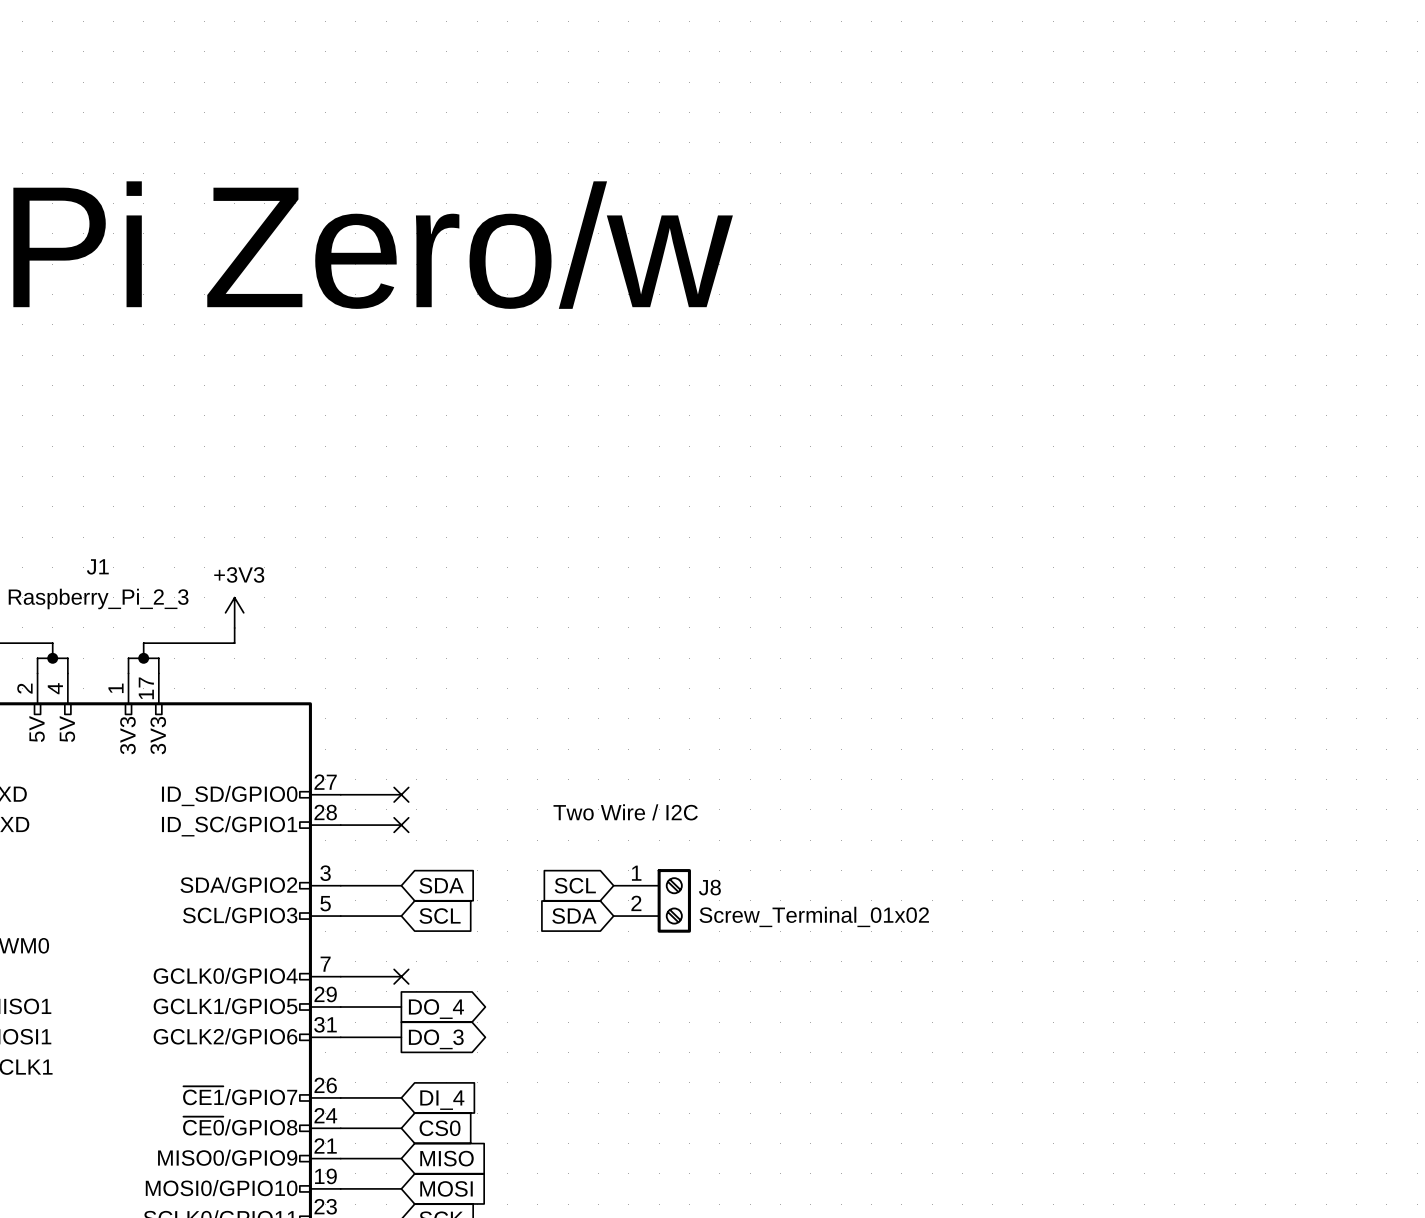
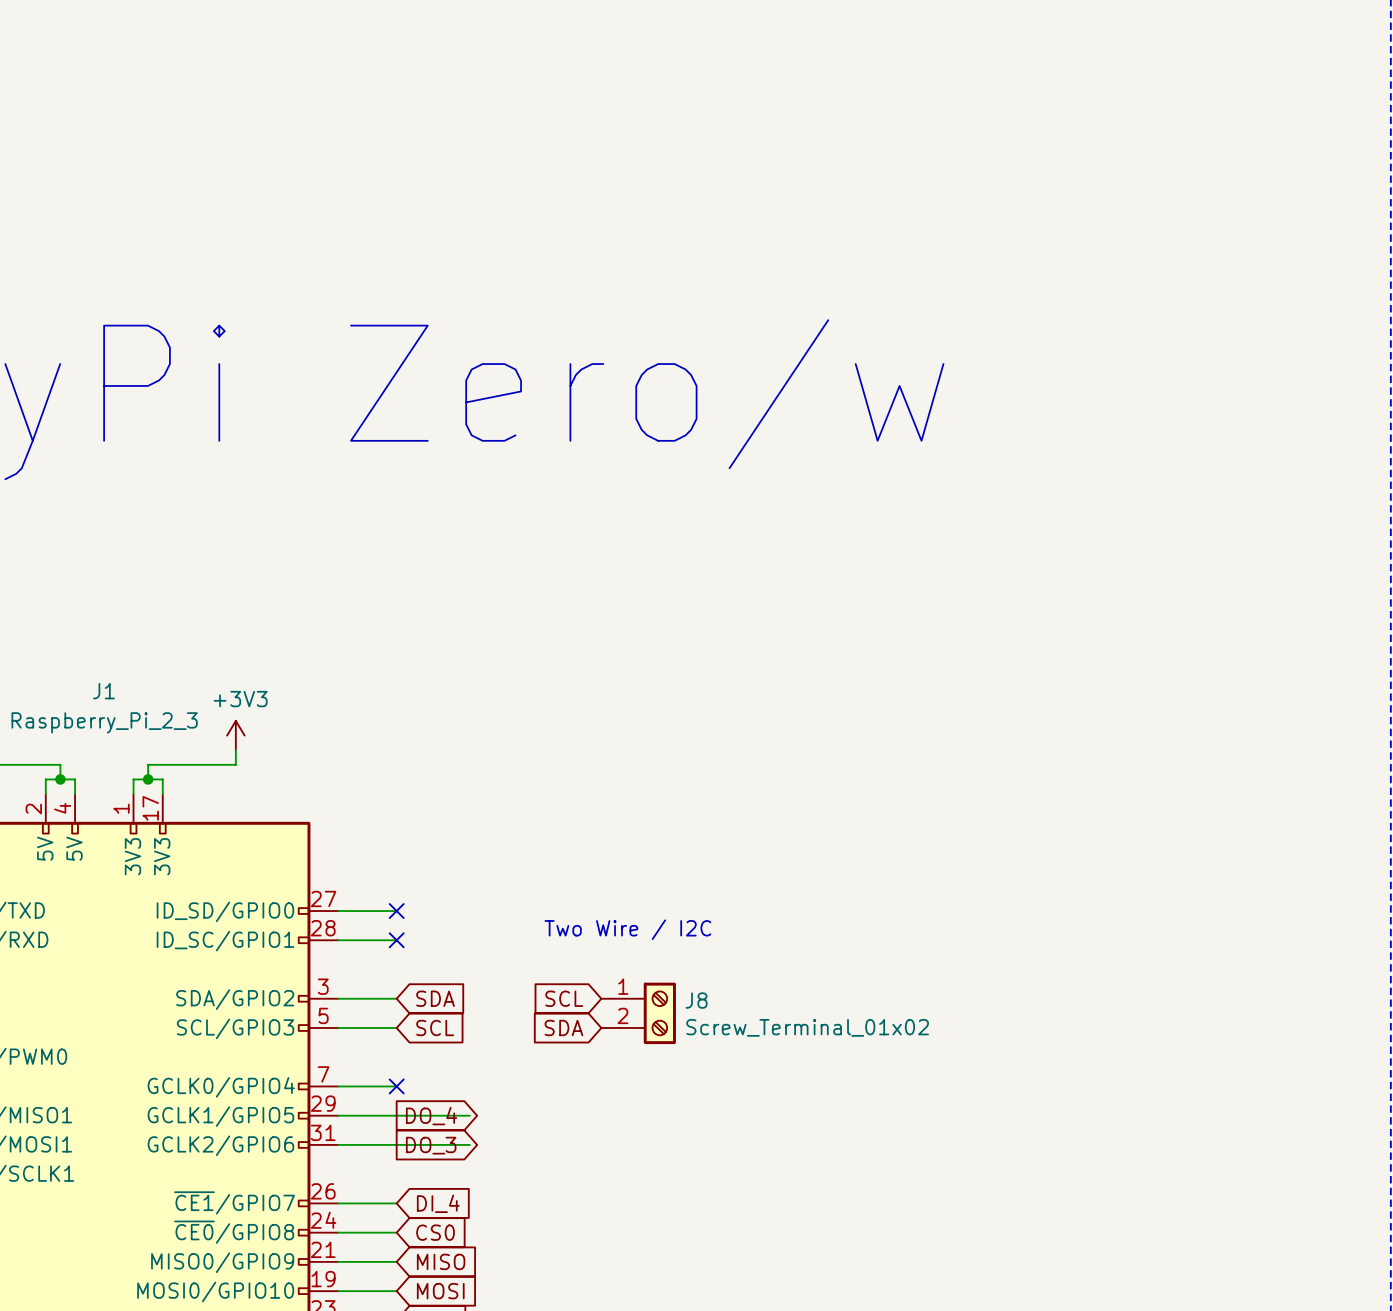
wire: none -> (396, 1115) (469, 1115)
wire: none -> (396, 1144) (469, 1144)

